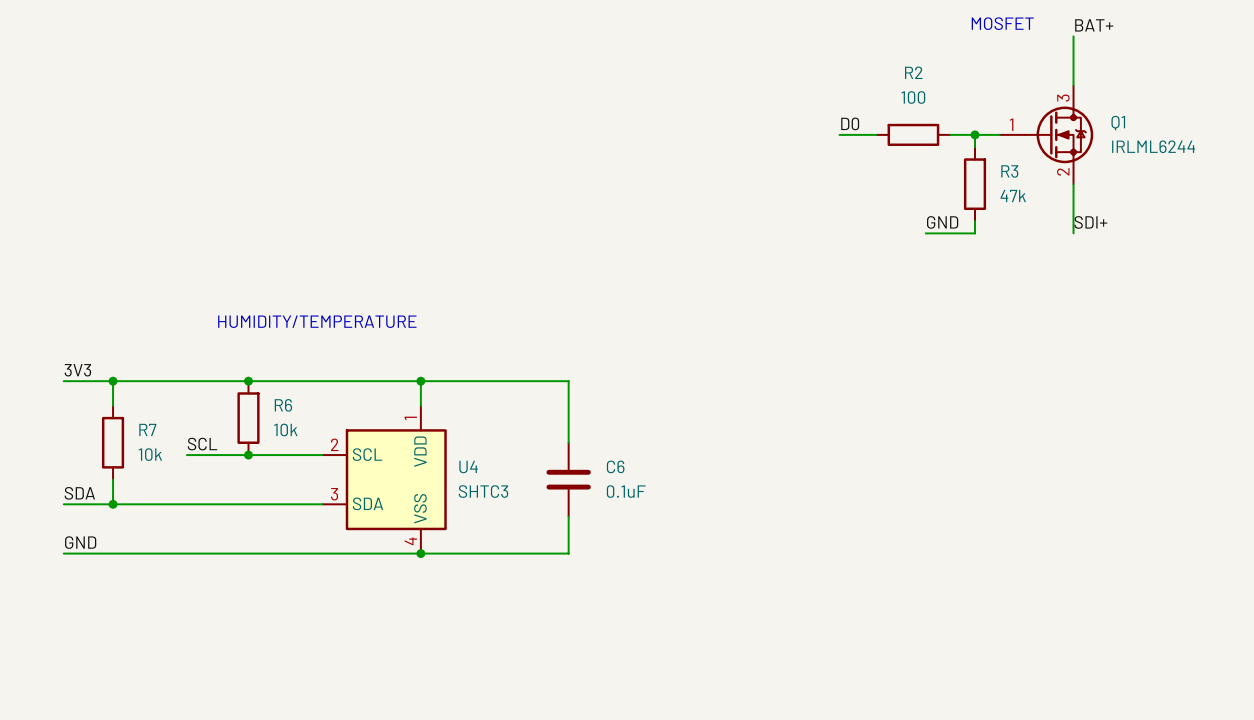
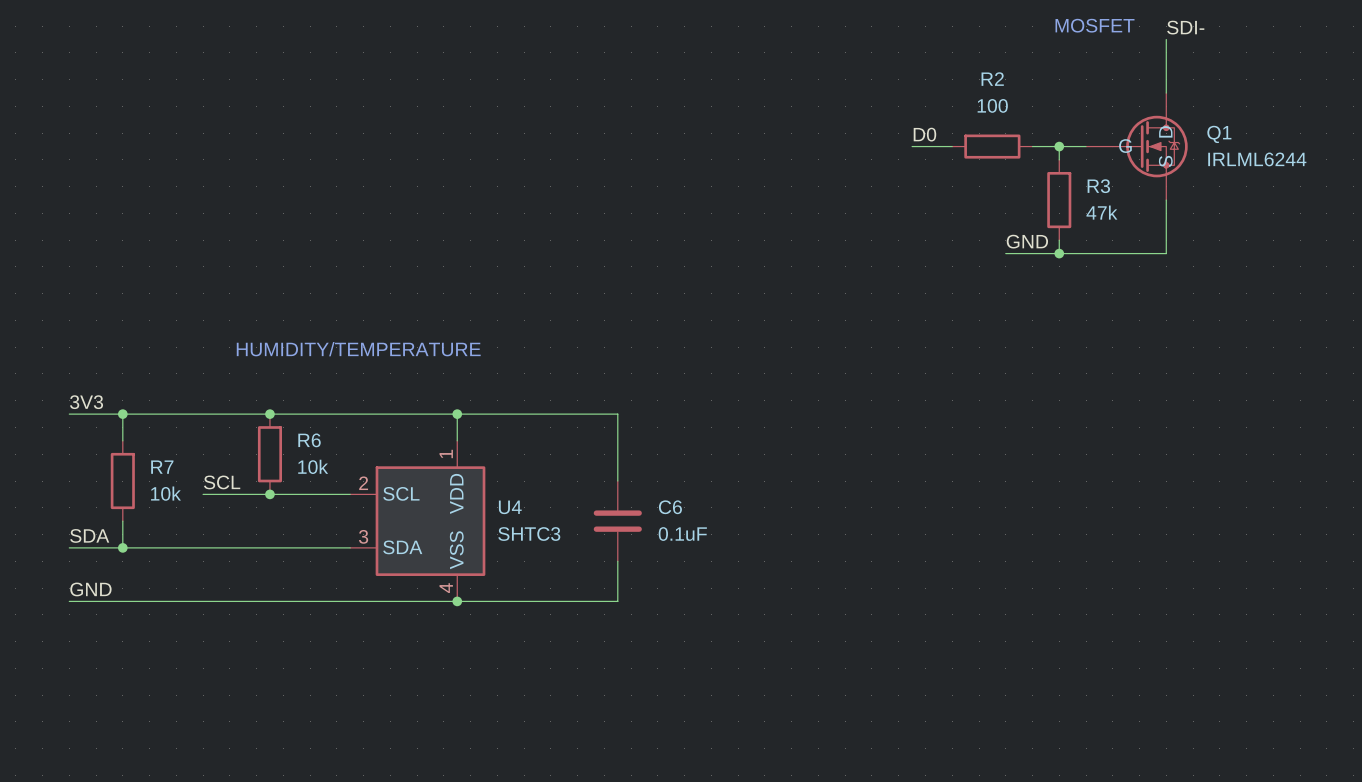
label: BAT+ (1094, 25) -> SDI- (1185, 27)
Q1 pin number: 3 (1063, 98) -> none
Q1 pin name: none -> D (1165, 131)
Q1 pin number: 1 (1011, 124) -> none
Q1 pin name: none -> G (1125, 146)
Q1 pin name: none -> S (1165, 161)
Q1 pin number: 2 (1063, 171) -> none
label: SDI+ (1090, 222) -> none
wire: none -> (1059, 253) (1166, 253)
junction: none -> (1059, 253)

